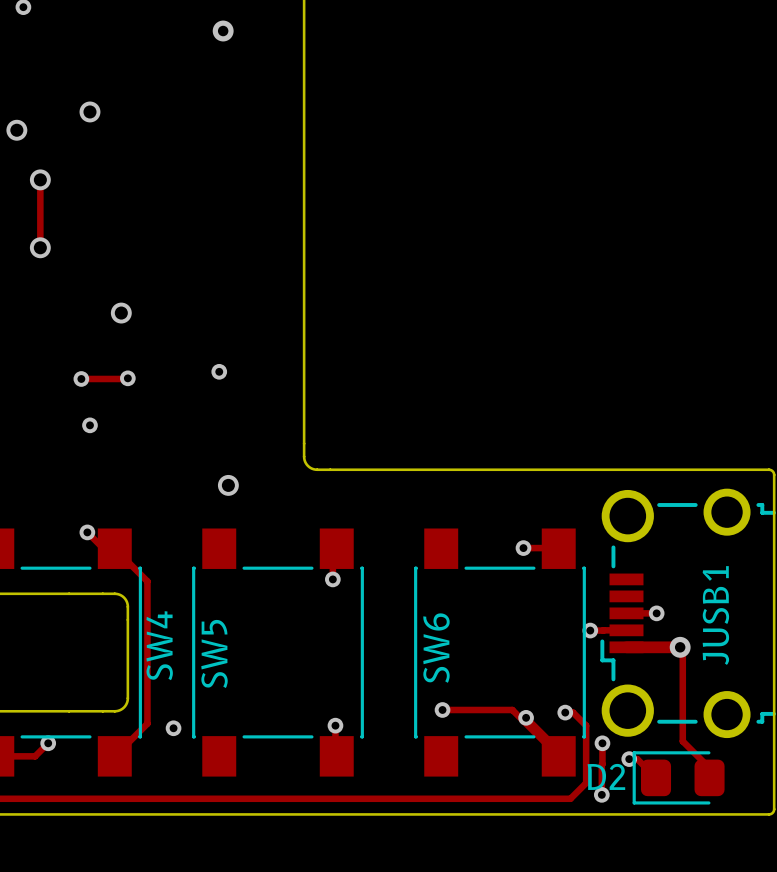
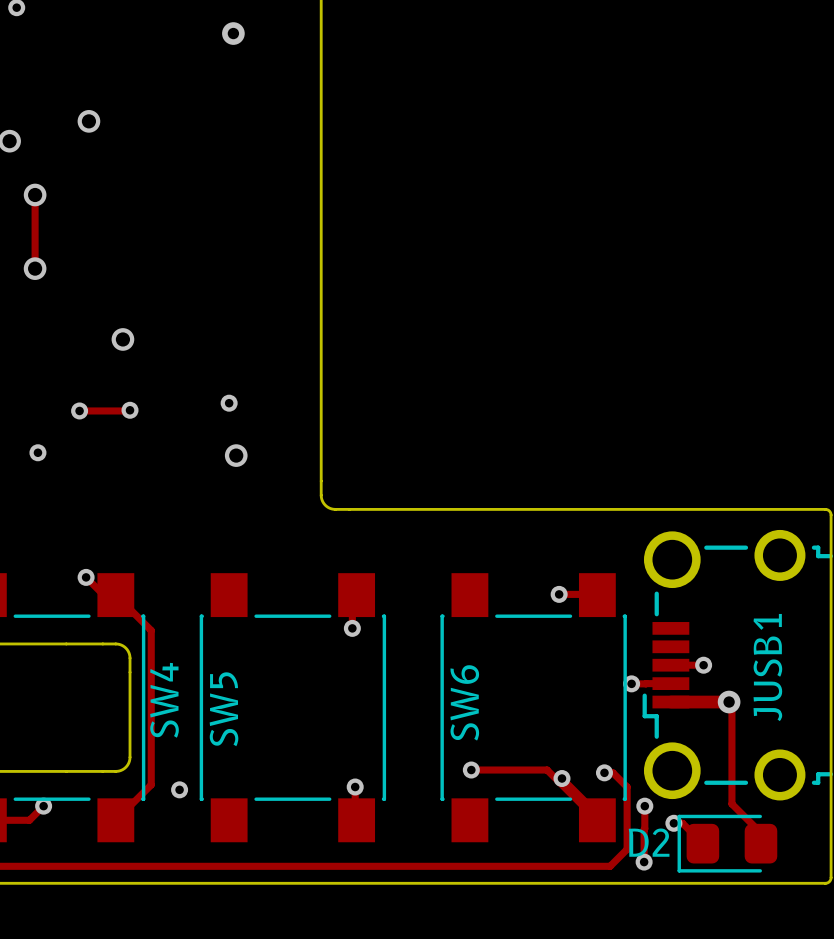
via position: (89, 425) -> (37, 452)
via position: (228, 485) -> (236, 455)

